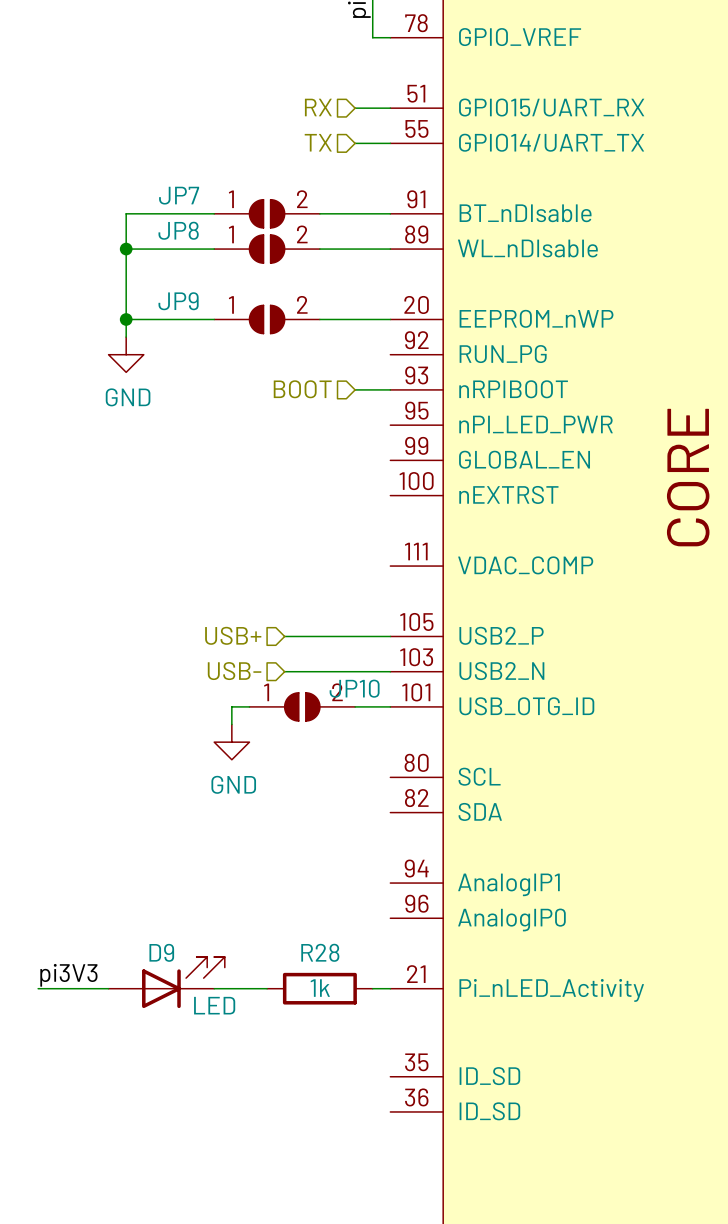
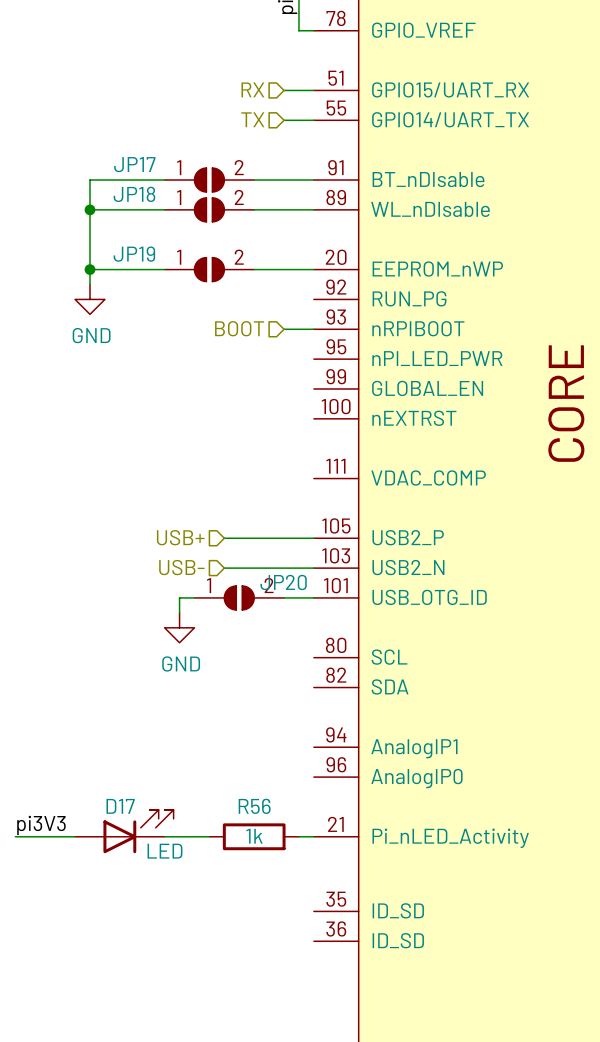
JP7 name: JP7 (179, 195) -> JP17 (134, 164)
JP8 name: JP8 (178, 230) -> JP18 (134, 194)
JP9 name: JP9 (178, 301) -> JP19 (134, 254)
JP10 name: JP10 (354, 688) -> JP20 (283, 582)
D9 name: D9 (161, 952) -> D17 (120, 806)
R28 name: R28 (320, 952) -> R56 (254, 806)

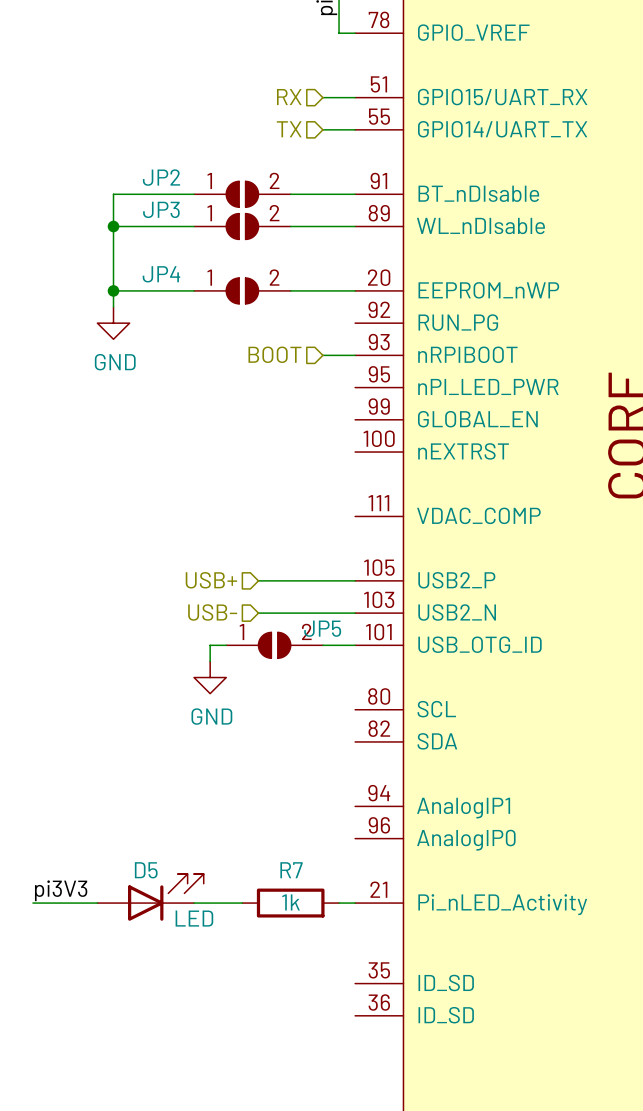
JP17 name: JP17 (134, 164) -> JP2 (161, 177)
JP18 name: JP18 (134, 194) -> JP3 (161, 209)
JP19 name: JP19 (134, 254) -> JP4 (161, 274)
JP20 name: JP20 (283, 582) -> JP5 (322, 628)
D17 name: D17 (120, 806) -> D5 (146, 870)
R56 name: R56 (254, 806) -> R7 (291, 870)

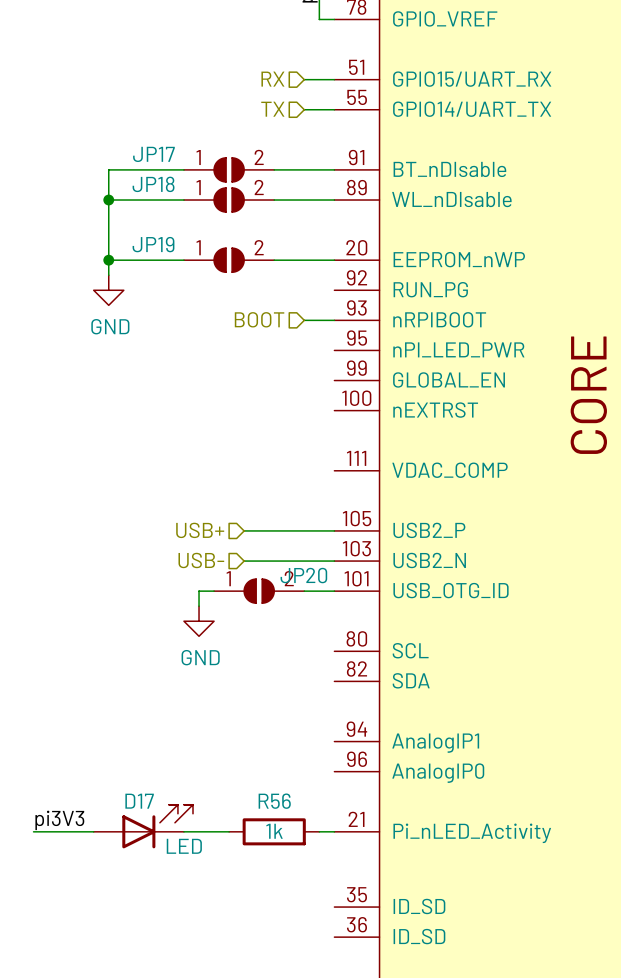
JP2 name: JP2 (161, 177) -> JP17 (153, 154)
JP3 name: JP3 (161, 209) -> JP18 (153, 184)
JP4 name: JP4 (161, 274) -> JP19 (153, 244)
JP5 name: JP5 (322, 628) -> JP20 (303, 575)
D5 name: D5 (146, 870) -> D17 (139, 801)
R7 name: R7 (291, 870) -> R56 (274, 801)

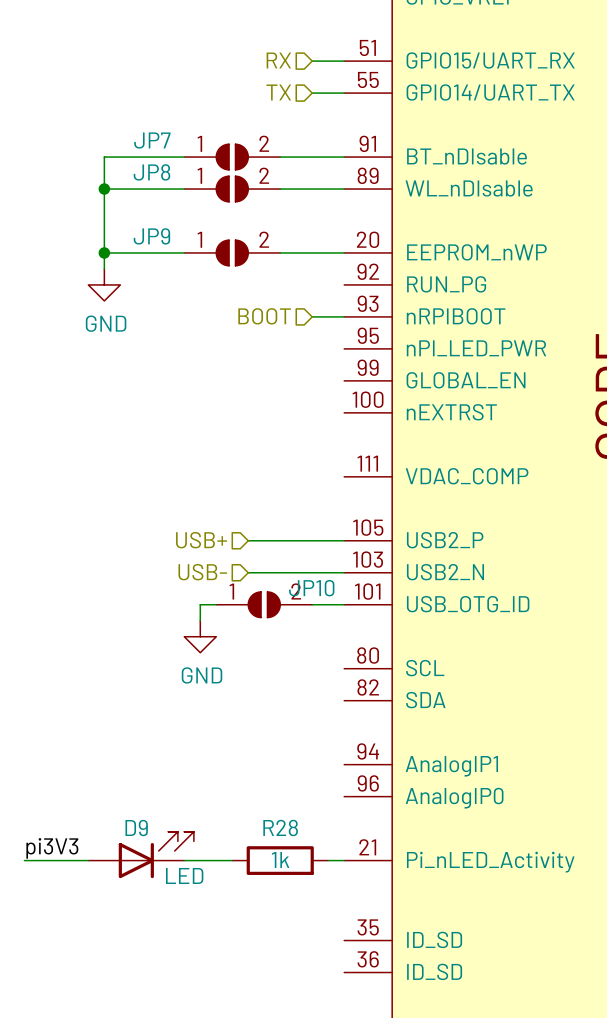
JP17 name: JP17 (153, 154) -> JP7 (152, 140)
JP18 name: JP18 (153, 184) -> JP8 (151, 172)
JP19 name: JP19 (153, 244) -> JP9 (151, 236)
JP20 name: JP20 (303, 575) -> JP10 (311, 588)
D17 name: D17 (139, 801) -> D9 (136, 828)
R56 name: R56 (274, 801) -> R28 (280, 827)

